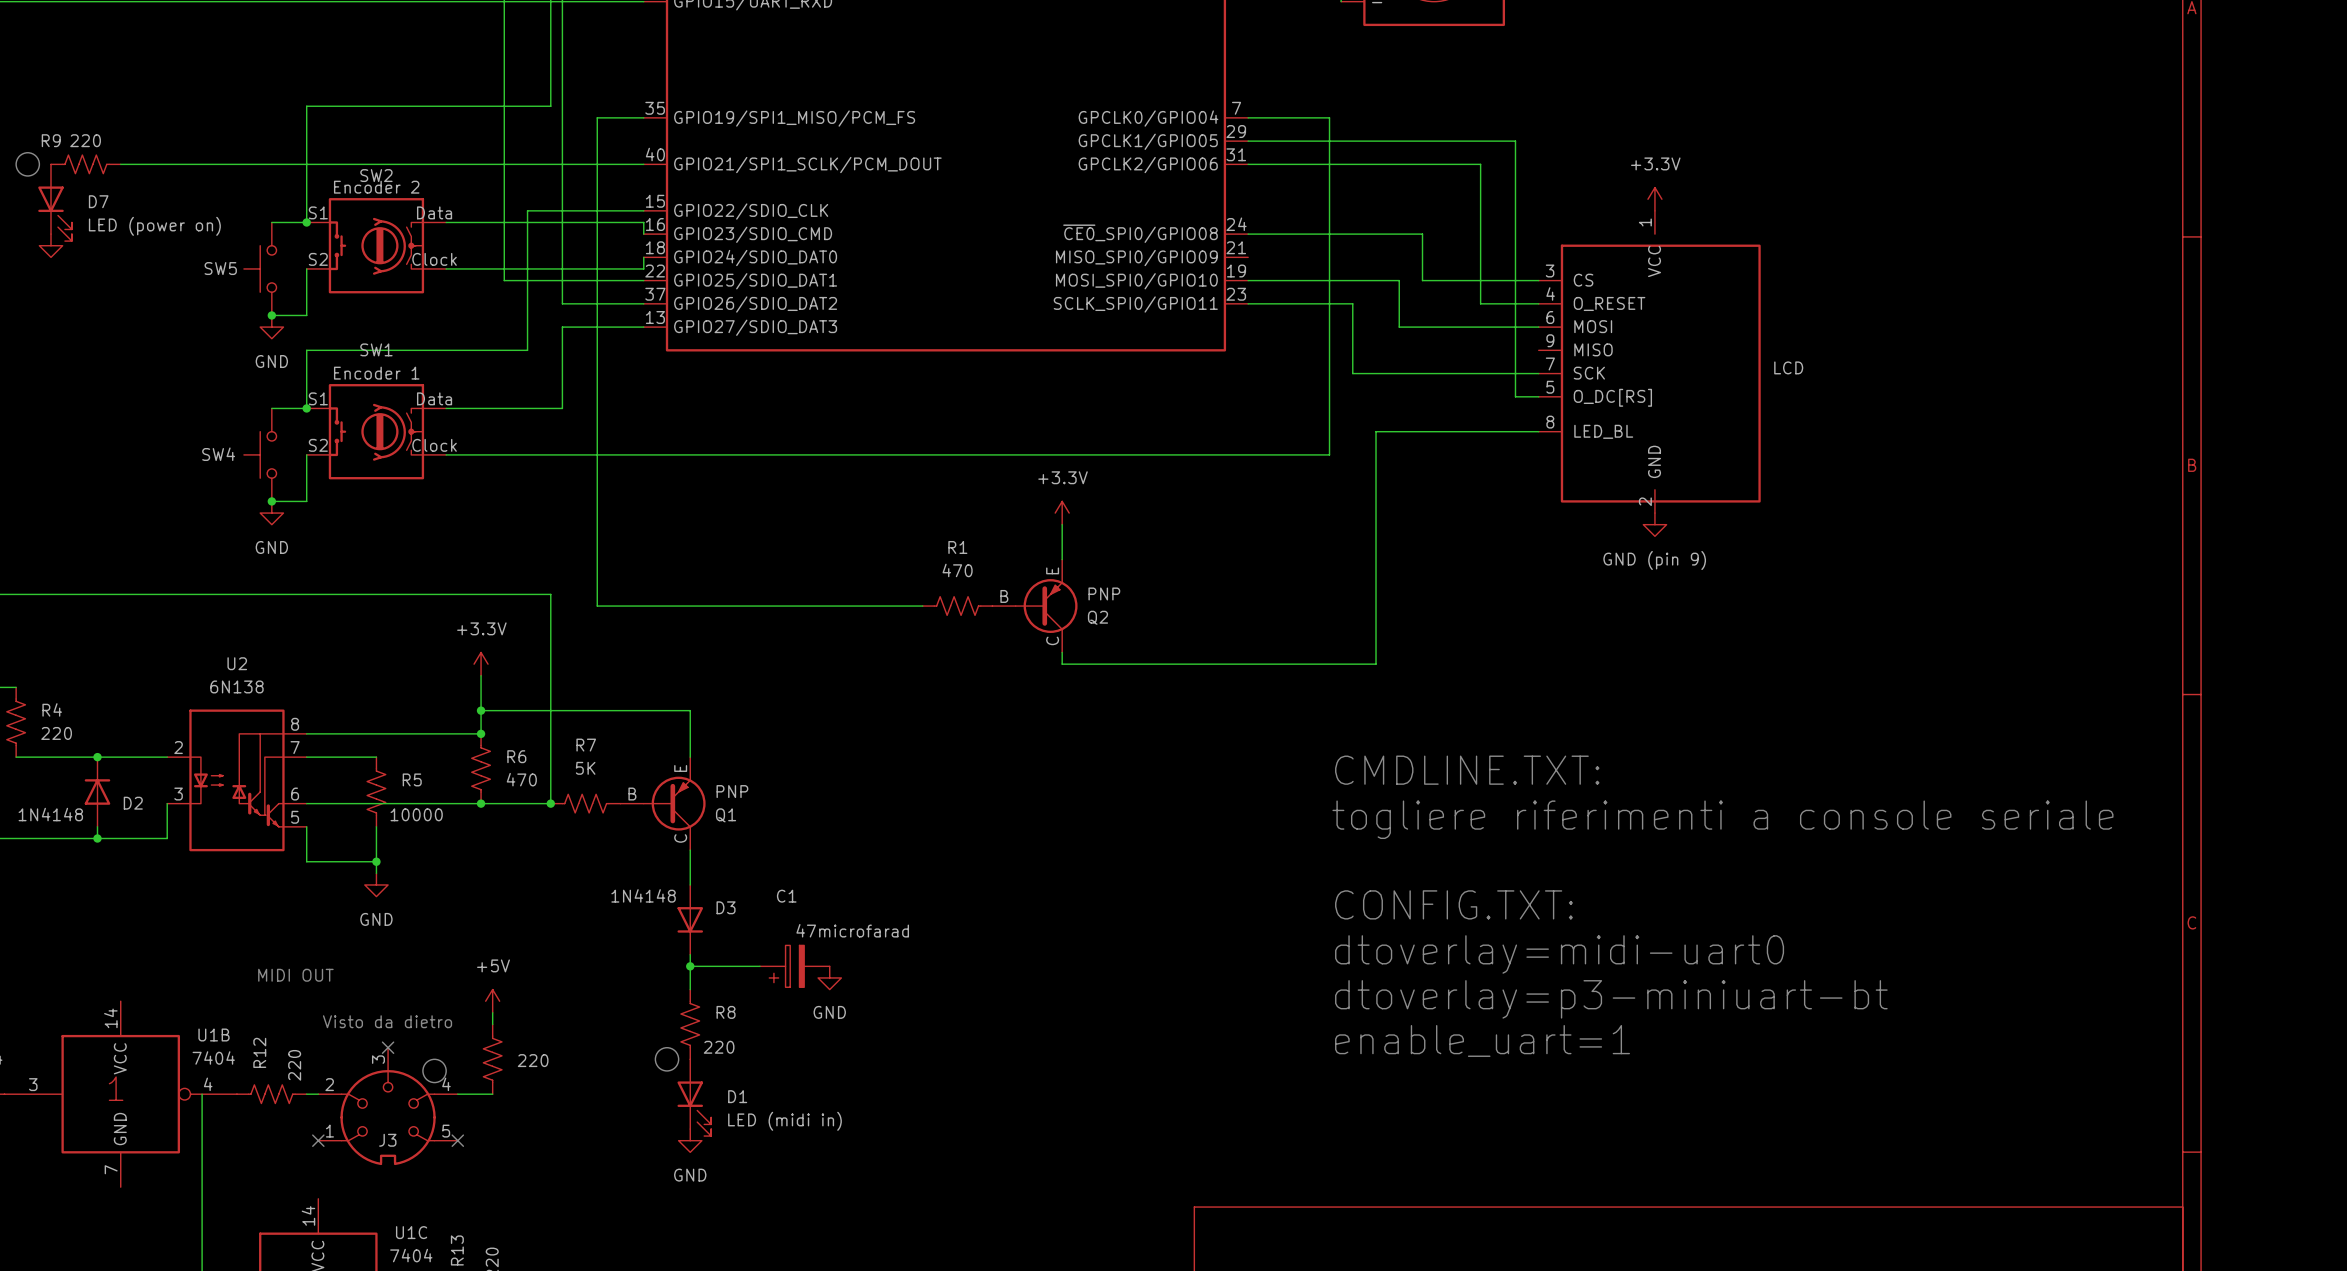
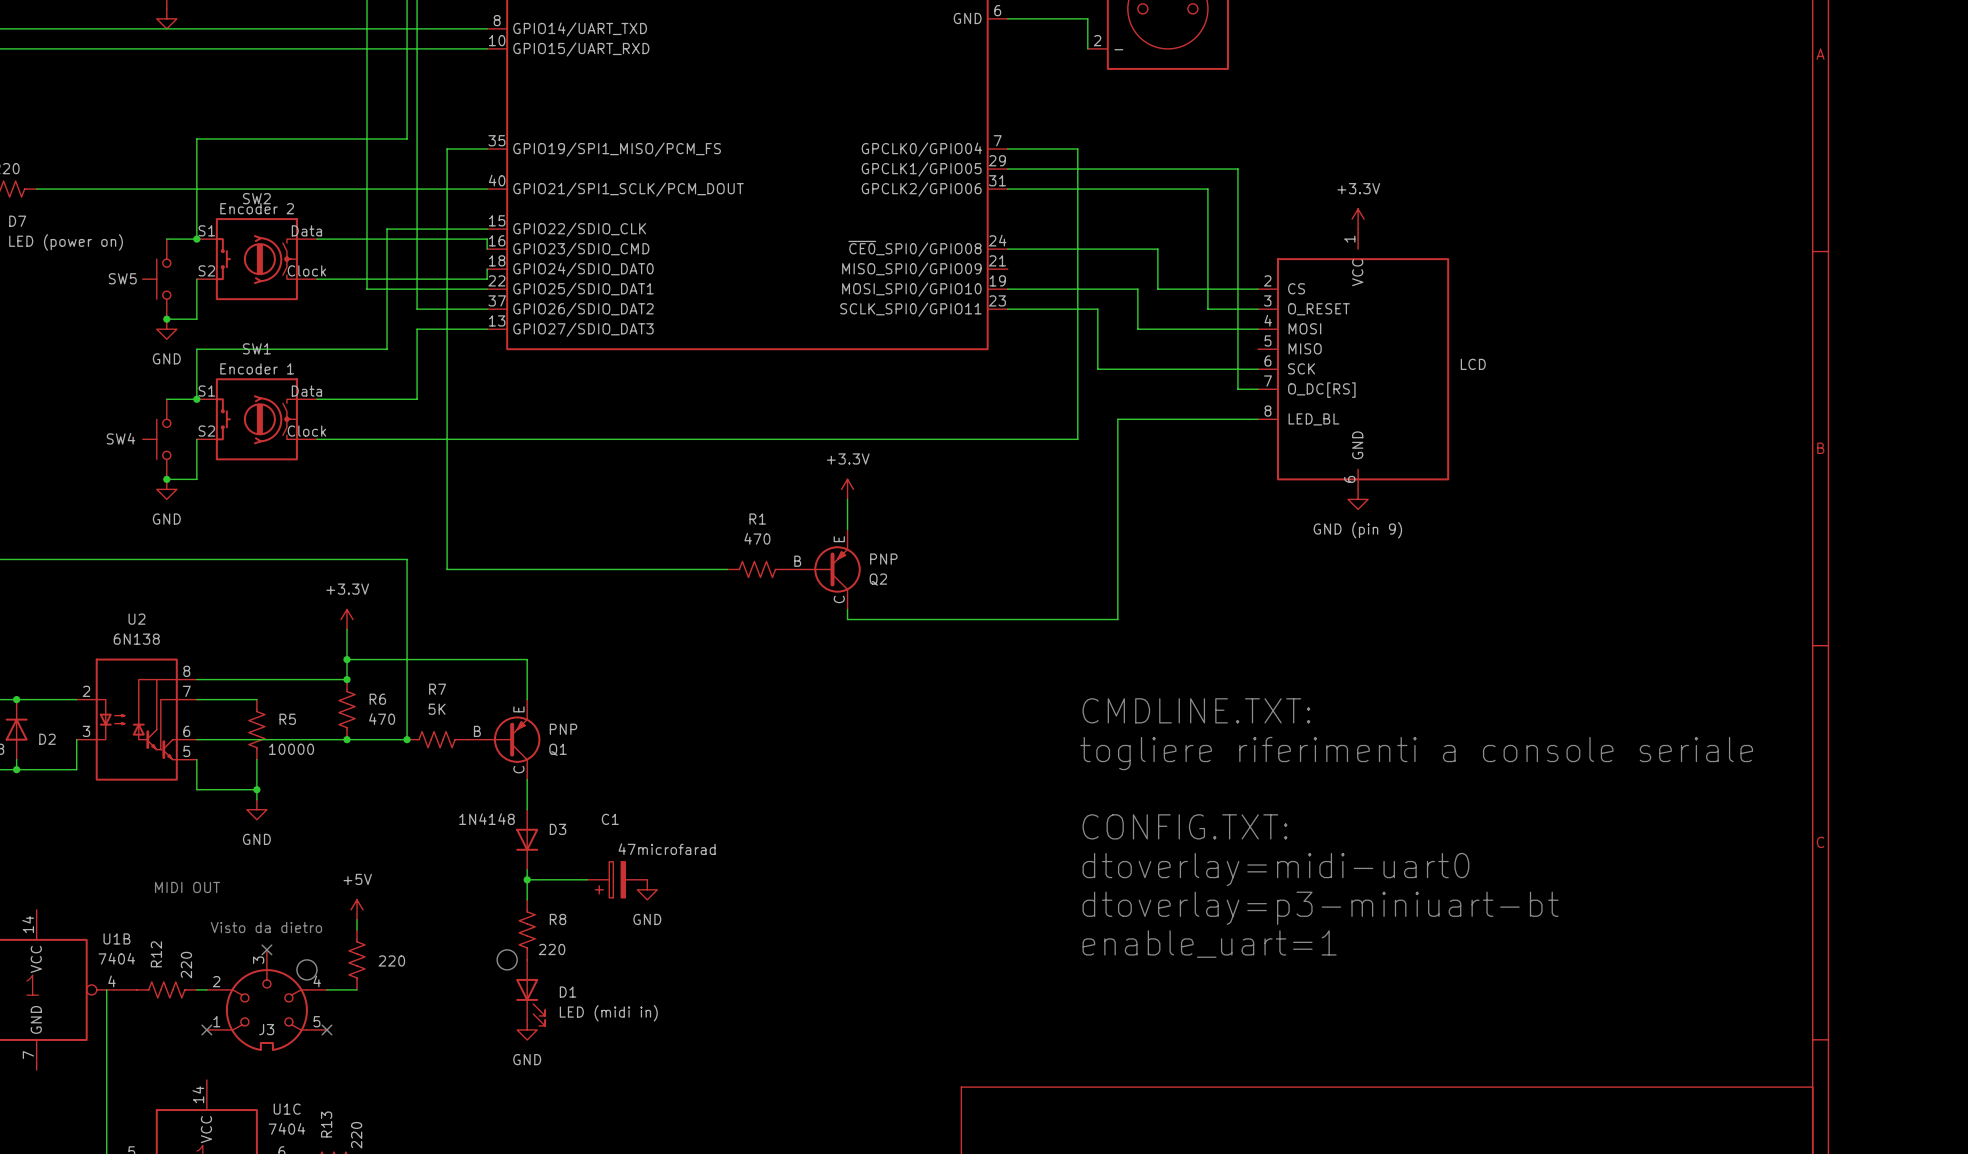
part pin number: 3 (1550, 271) -> 2 (1267, 280)
part pin number: 4 (1550, 293) -> 3 (1267, 300)
part pin number: 6 (1550, 317) -> 4 (1268, 320)
part pin number: 9 (1550, 340) -> 5 (1267, 340)
part pin number: 7 (1550, 363) -> 6 (1267, 360)
part pin number: 5 (1550, 387) -> 7 (1267, 381)
part pin number: 2 (1645, 501) -> 6 (1349, 479)

